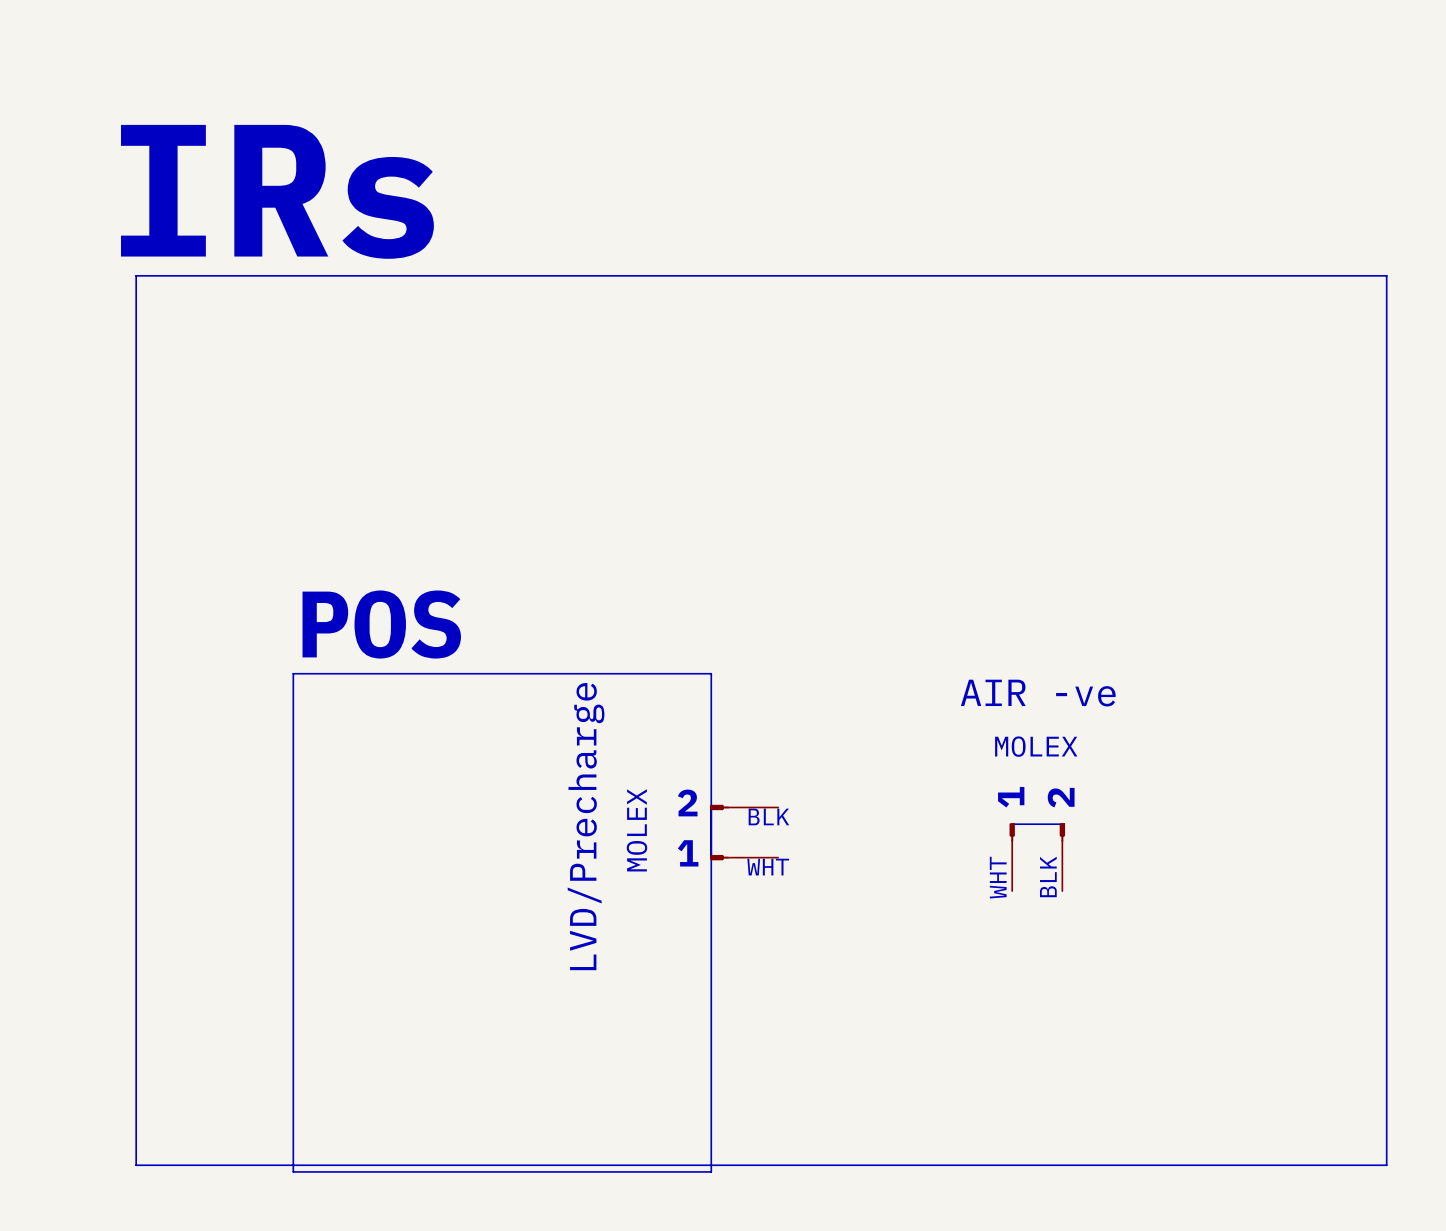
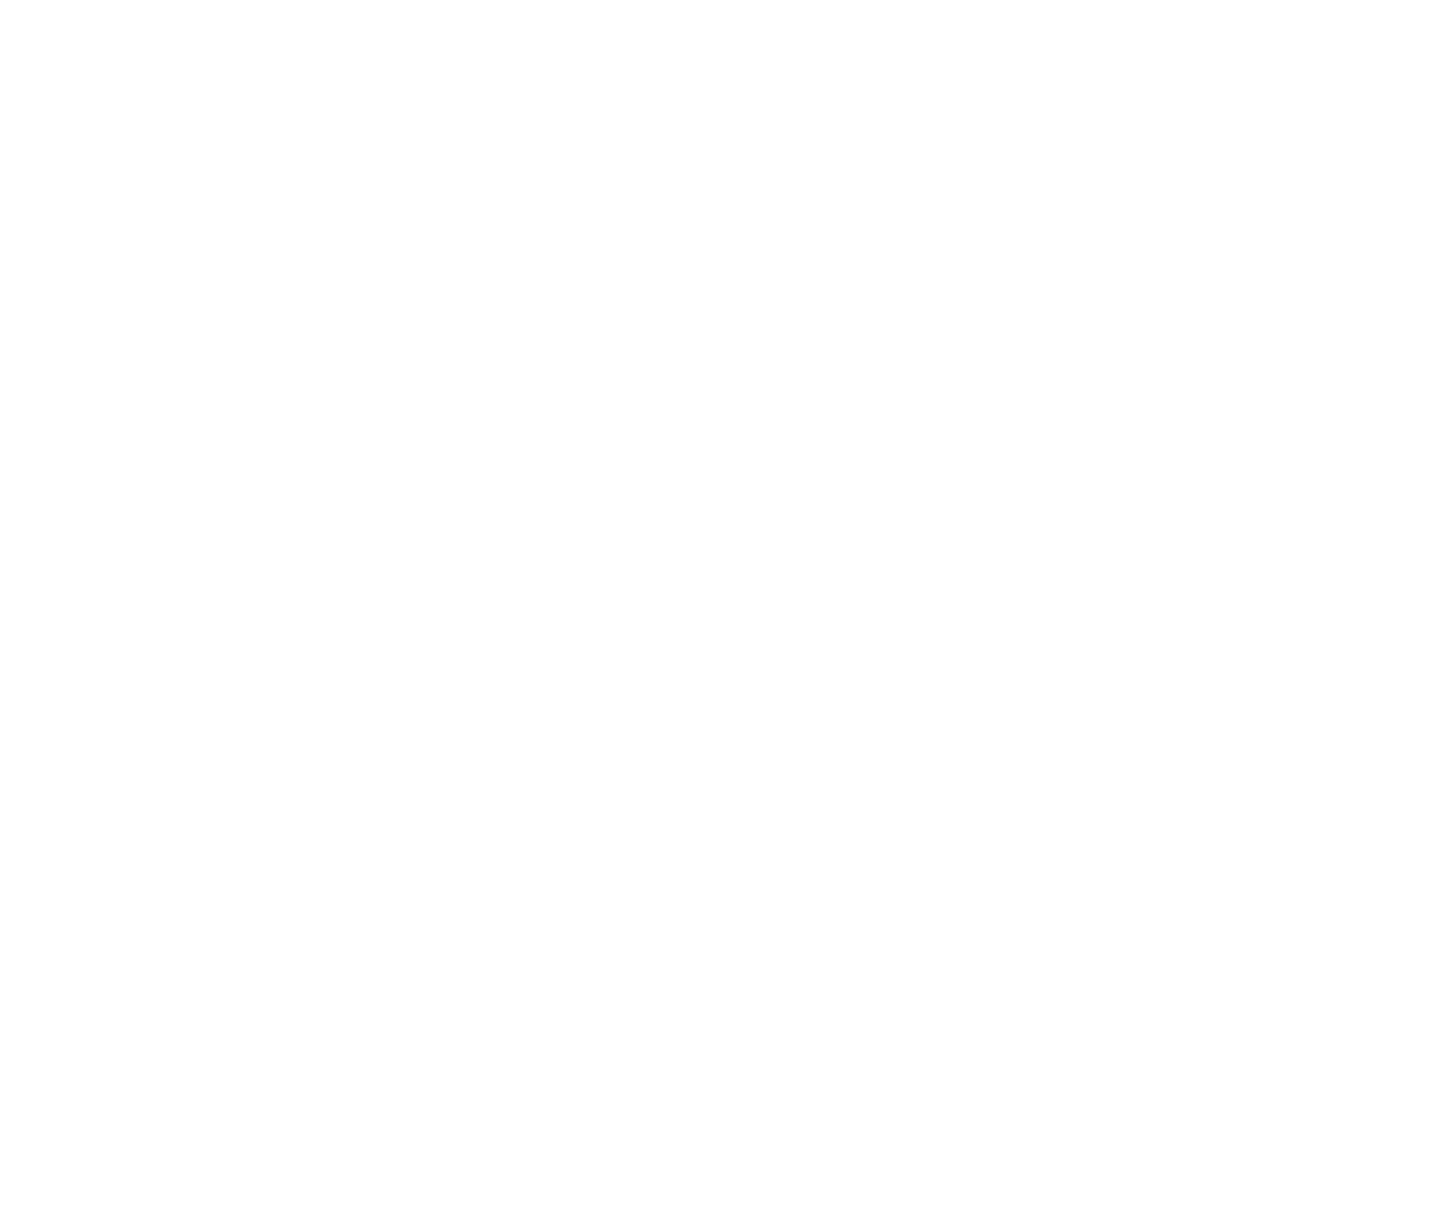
text: IRs (277, 191) -> none
line: (136, 275) (1386, 275) (1386, 1165) (136, 1165) (136, 275) -> none
text: POS (381, 624) -> none
line: (293, 673) (711, 673) (711, 1171) (293, 1171) (293, 673) -> none
text: AIR -ve (1038, 693) -> none
text: MOLEX (1036, 746) -> none
text: 1 (1011, 797) -> none
text: 2 (1061, 797) -> none
text: 2 (687, 802) -> none
part: (744, 807) -> none
text: BLK (768, 816) -> none
line: (1012, 824) (1062, 824) -> none
text: LVD/Precharge (586, 826) -> none
text: MOLEX (636, 830) -> none
text: 1 (688, 853) -> none
part: (744, 857) -> none
part: (1012, 857) -> none
part: (1062, 857) -> none
text: WHT (768, 867) -> none
text: BLK (1048, 876) -> none
text: WHT (998, 877) -> none

